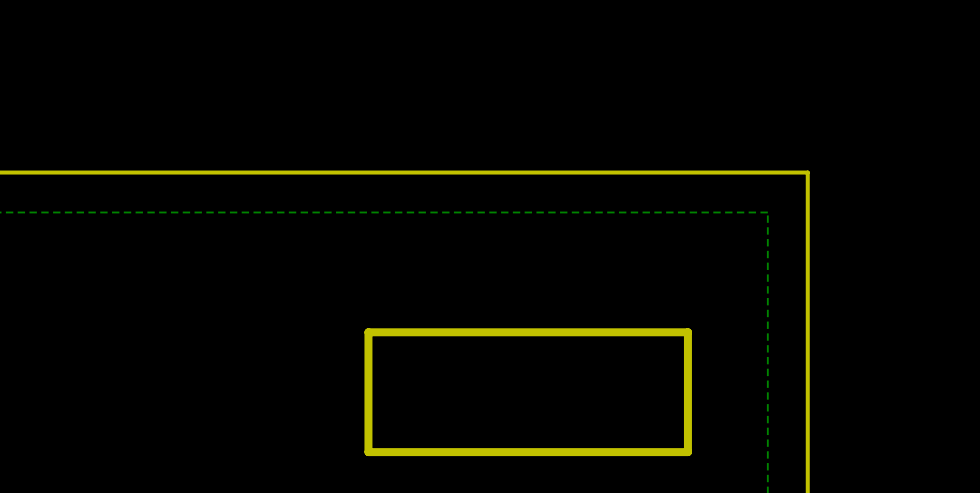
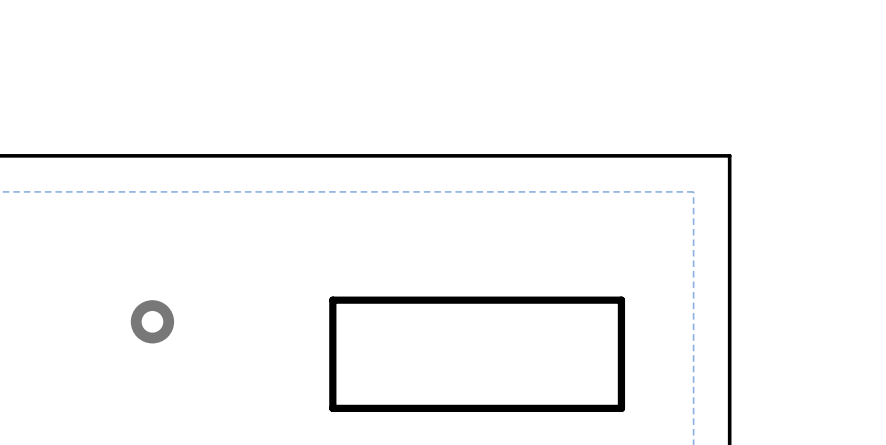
via: none -> (152, 321)

